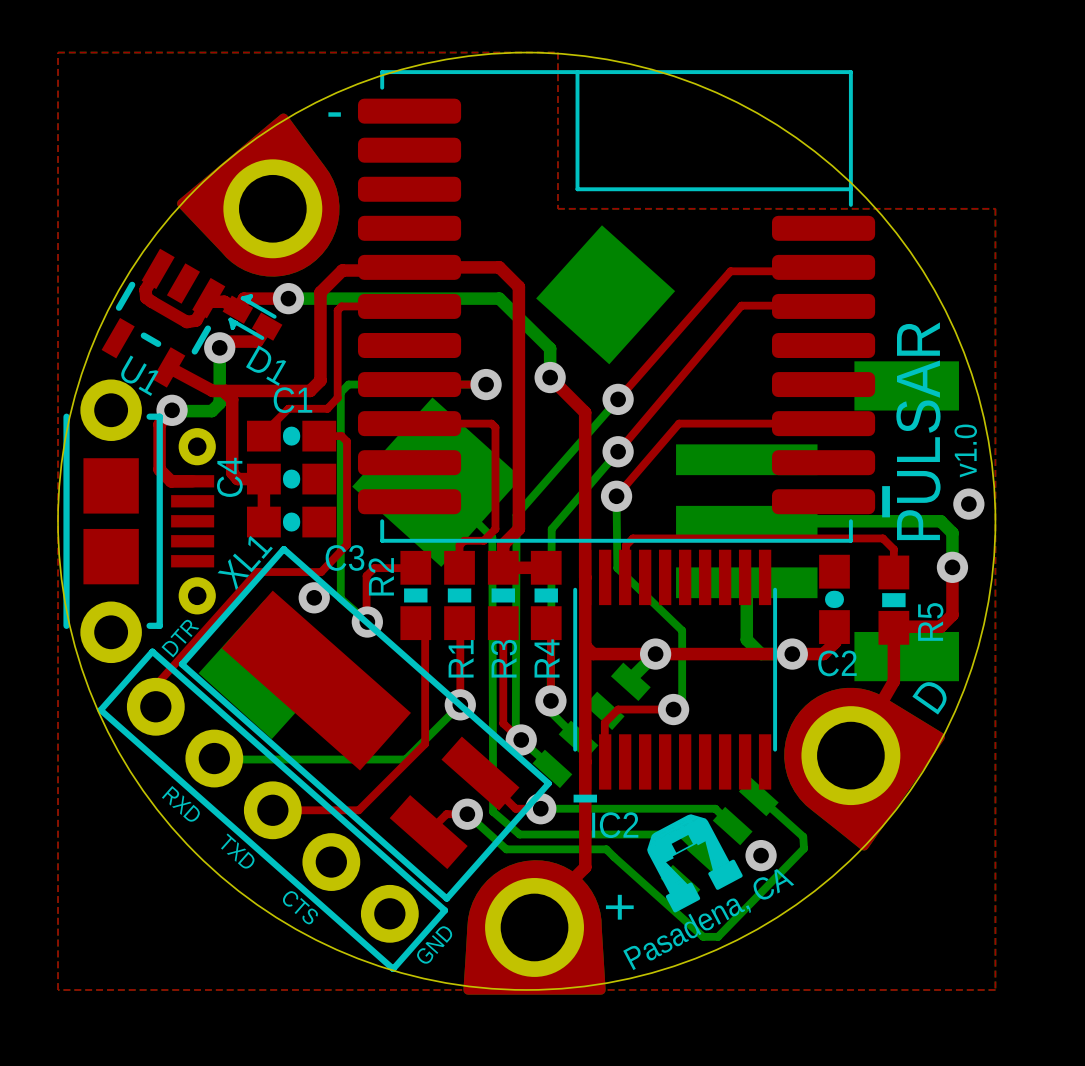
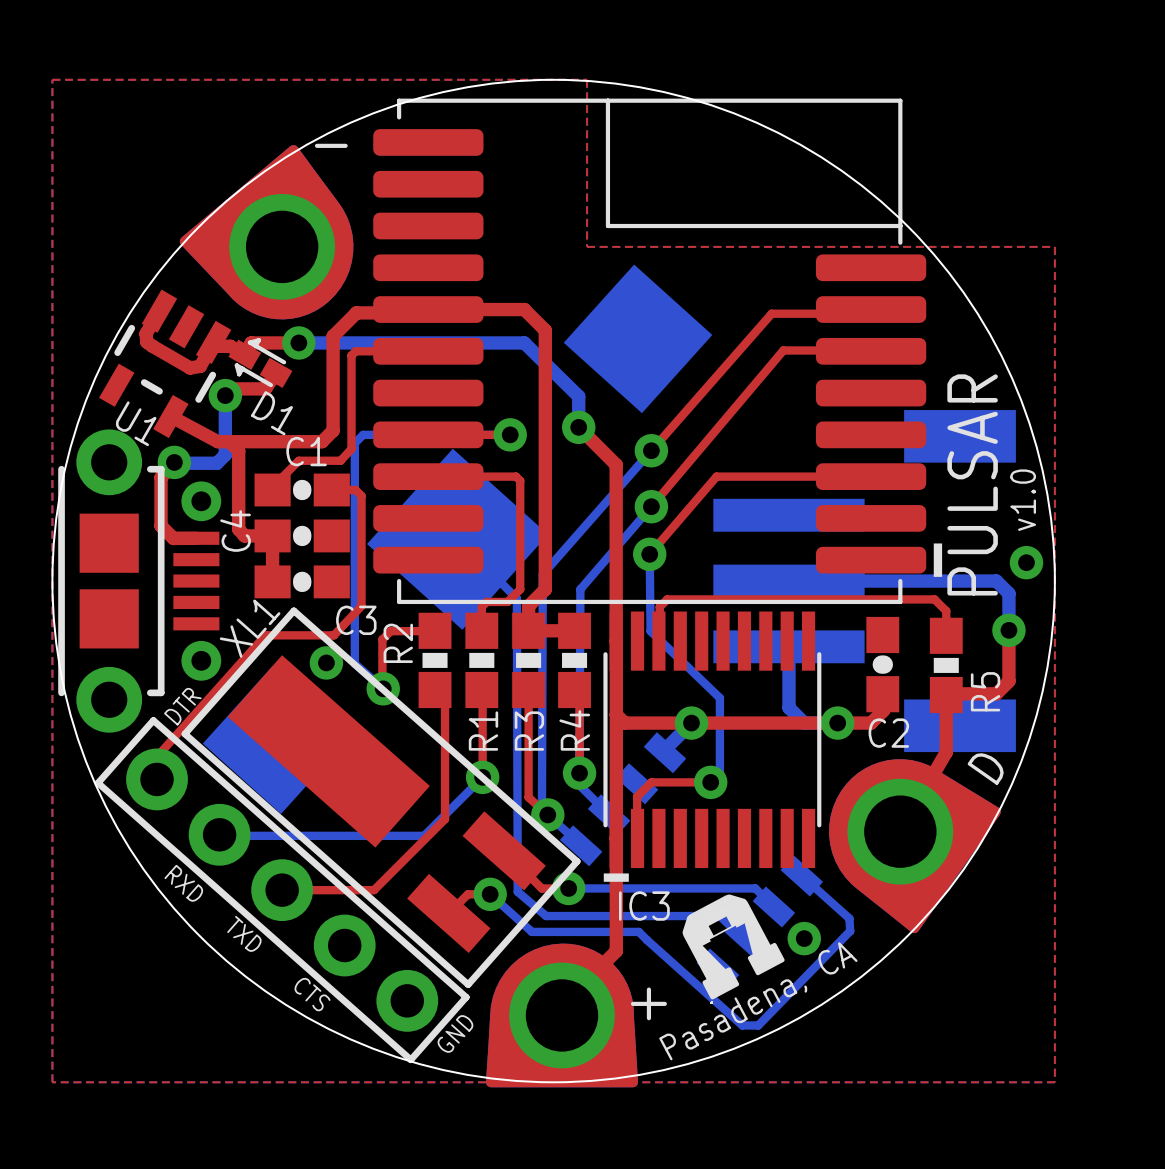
IC2 name: IC2 (615, 825) -> IC3 (644, 906)

